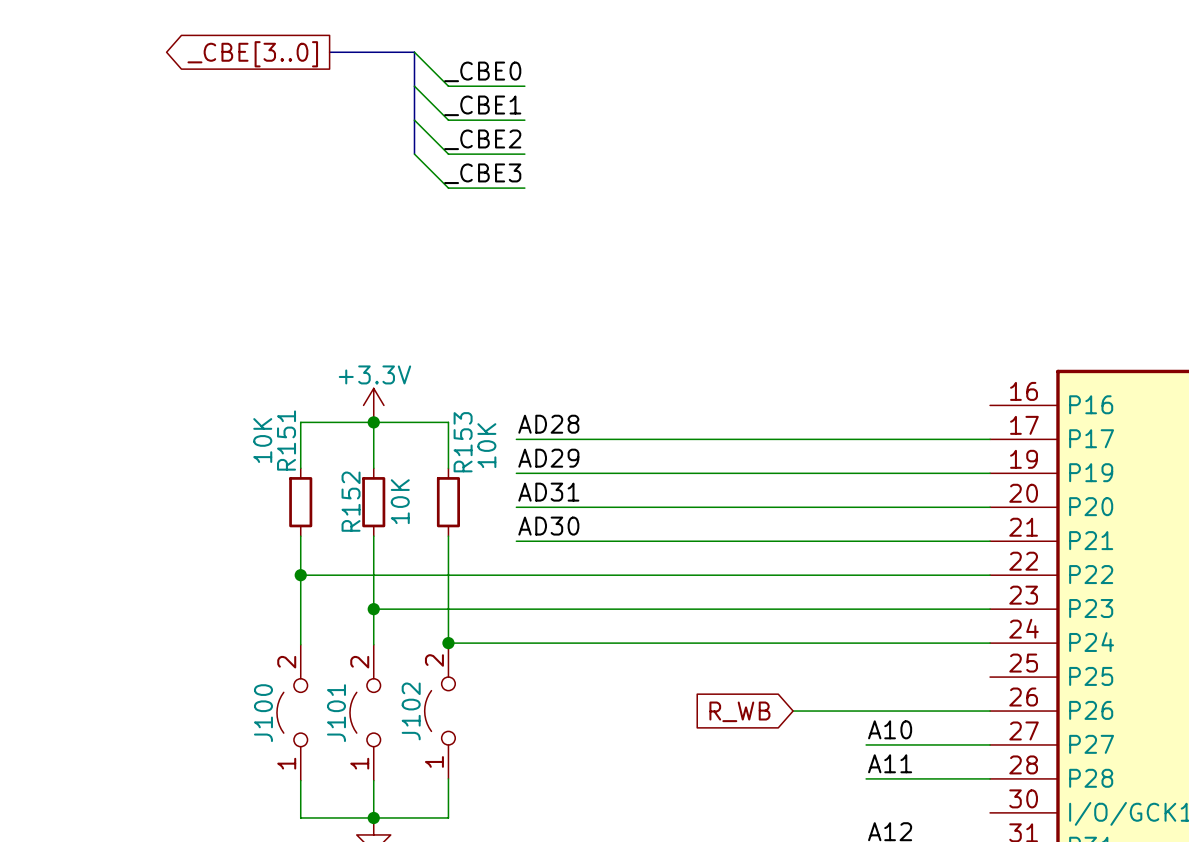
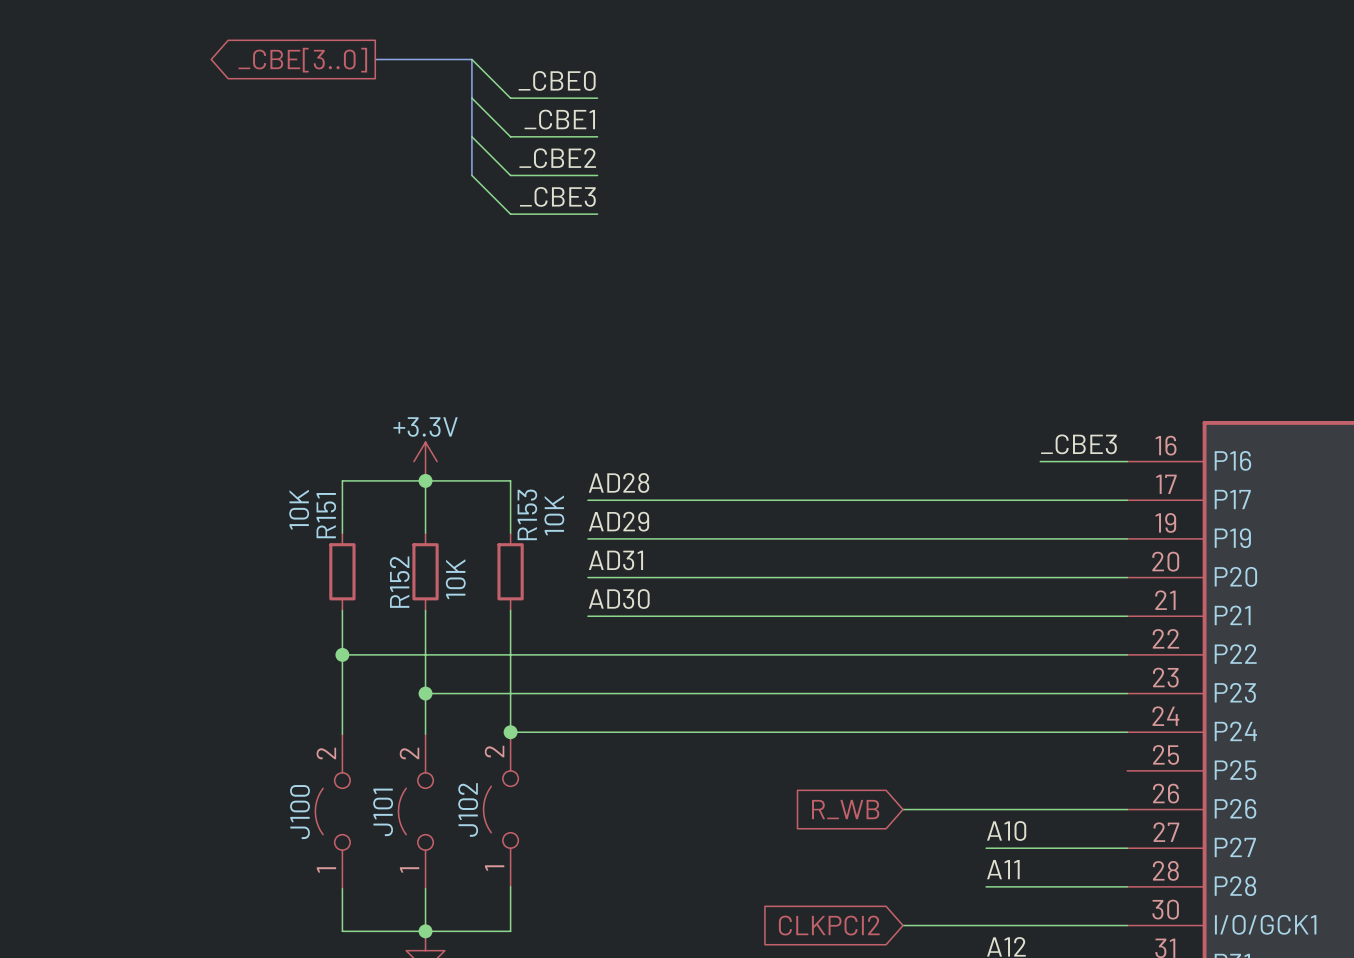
label: none -> _CBE3 (1078, 444)
wire: none -> (1040, 461) (1127, 461)
global label: none -> CLKPCI2 (829, 925)
wire: none -> (903, 925) (1127, 925)

